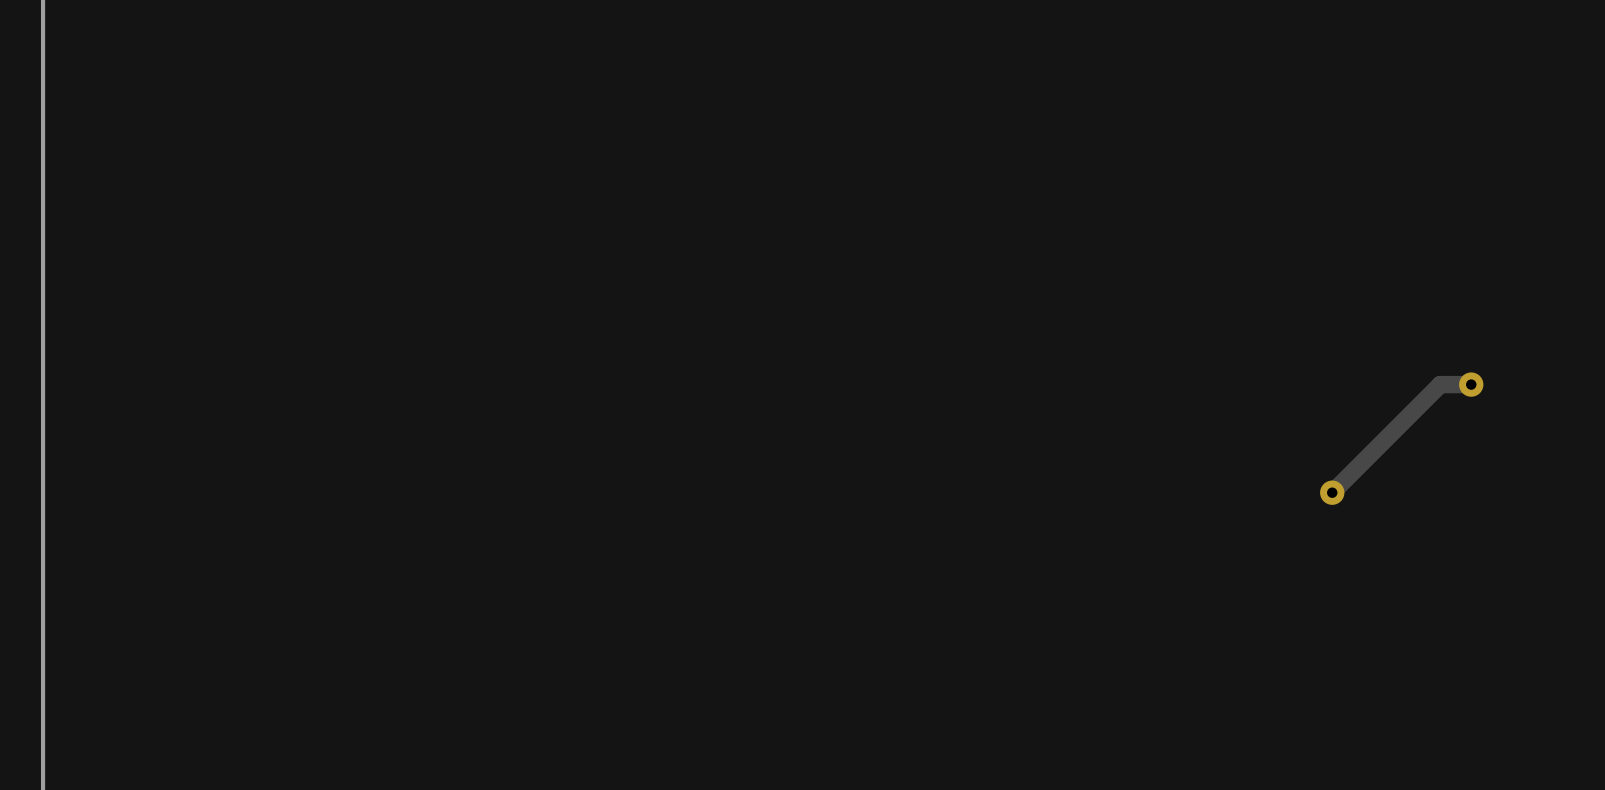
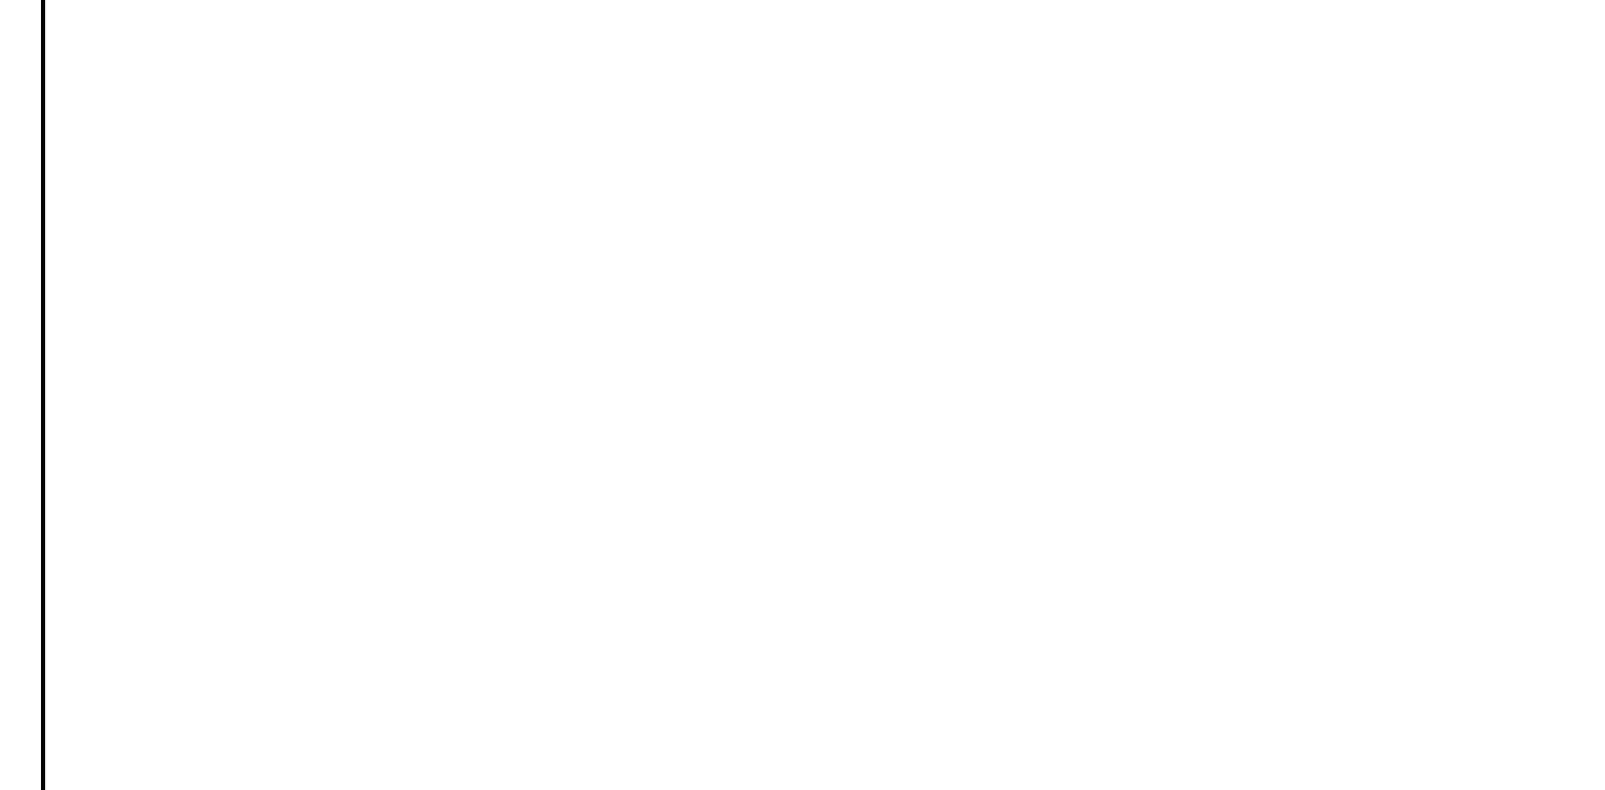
track: (1471, 384) (1440, 384) (1332, 492) -> none
via: (1471, 384) -> none
via: (1332, 492) -> none

